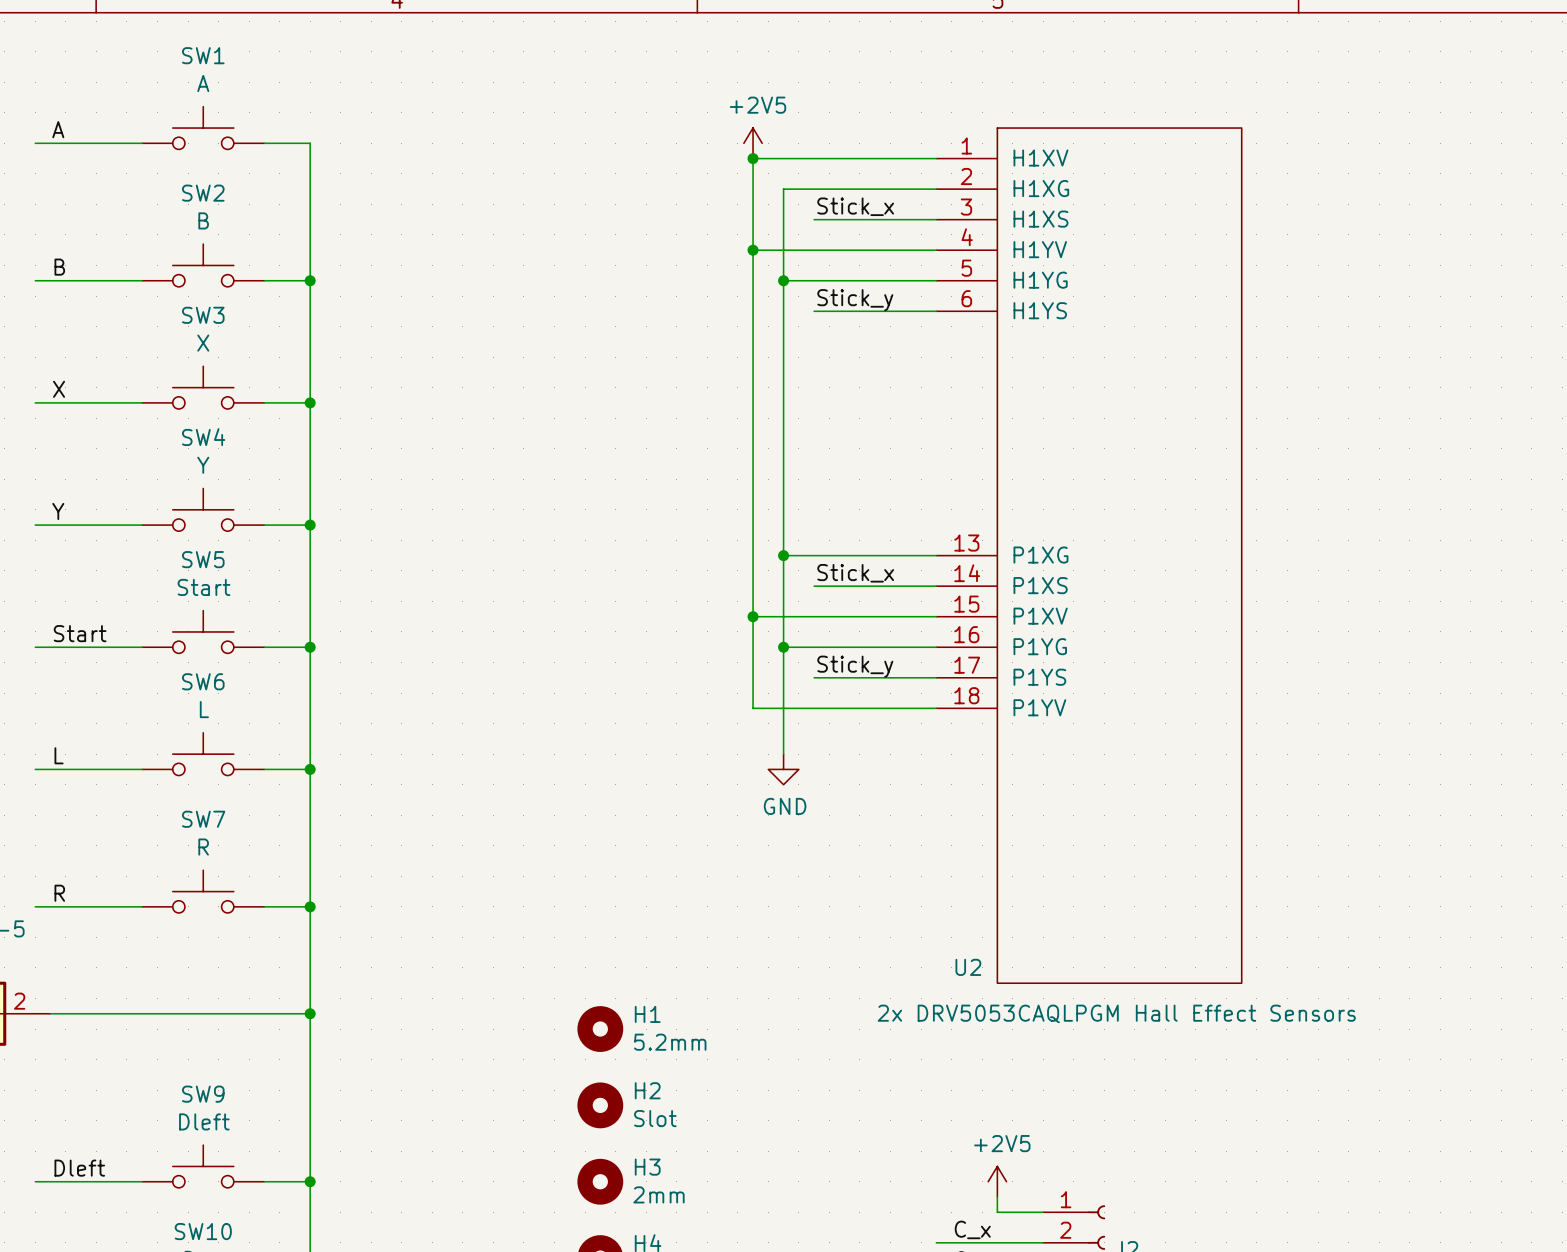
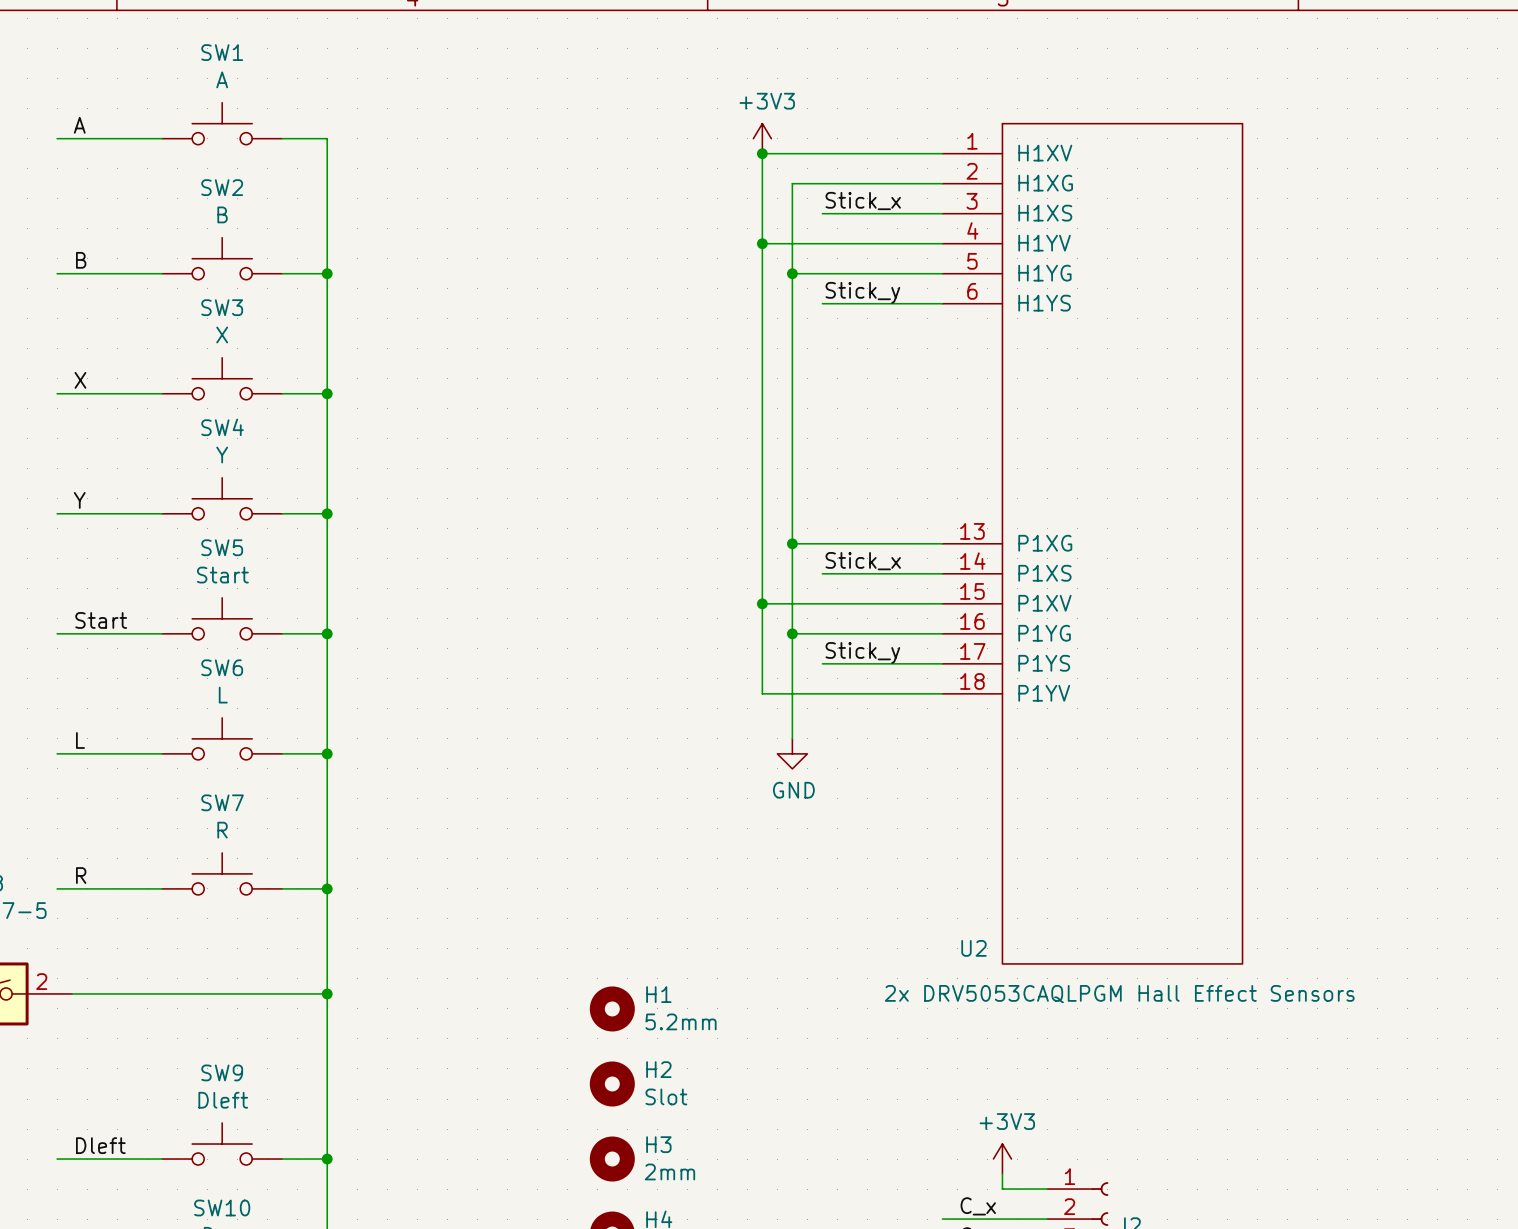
power symbol: +2V5 (753, 143) -> +3V3 (762, 138)
power symbol: +2V5 (997, 1181) -> +3V3 (1002, 1159)

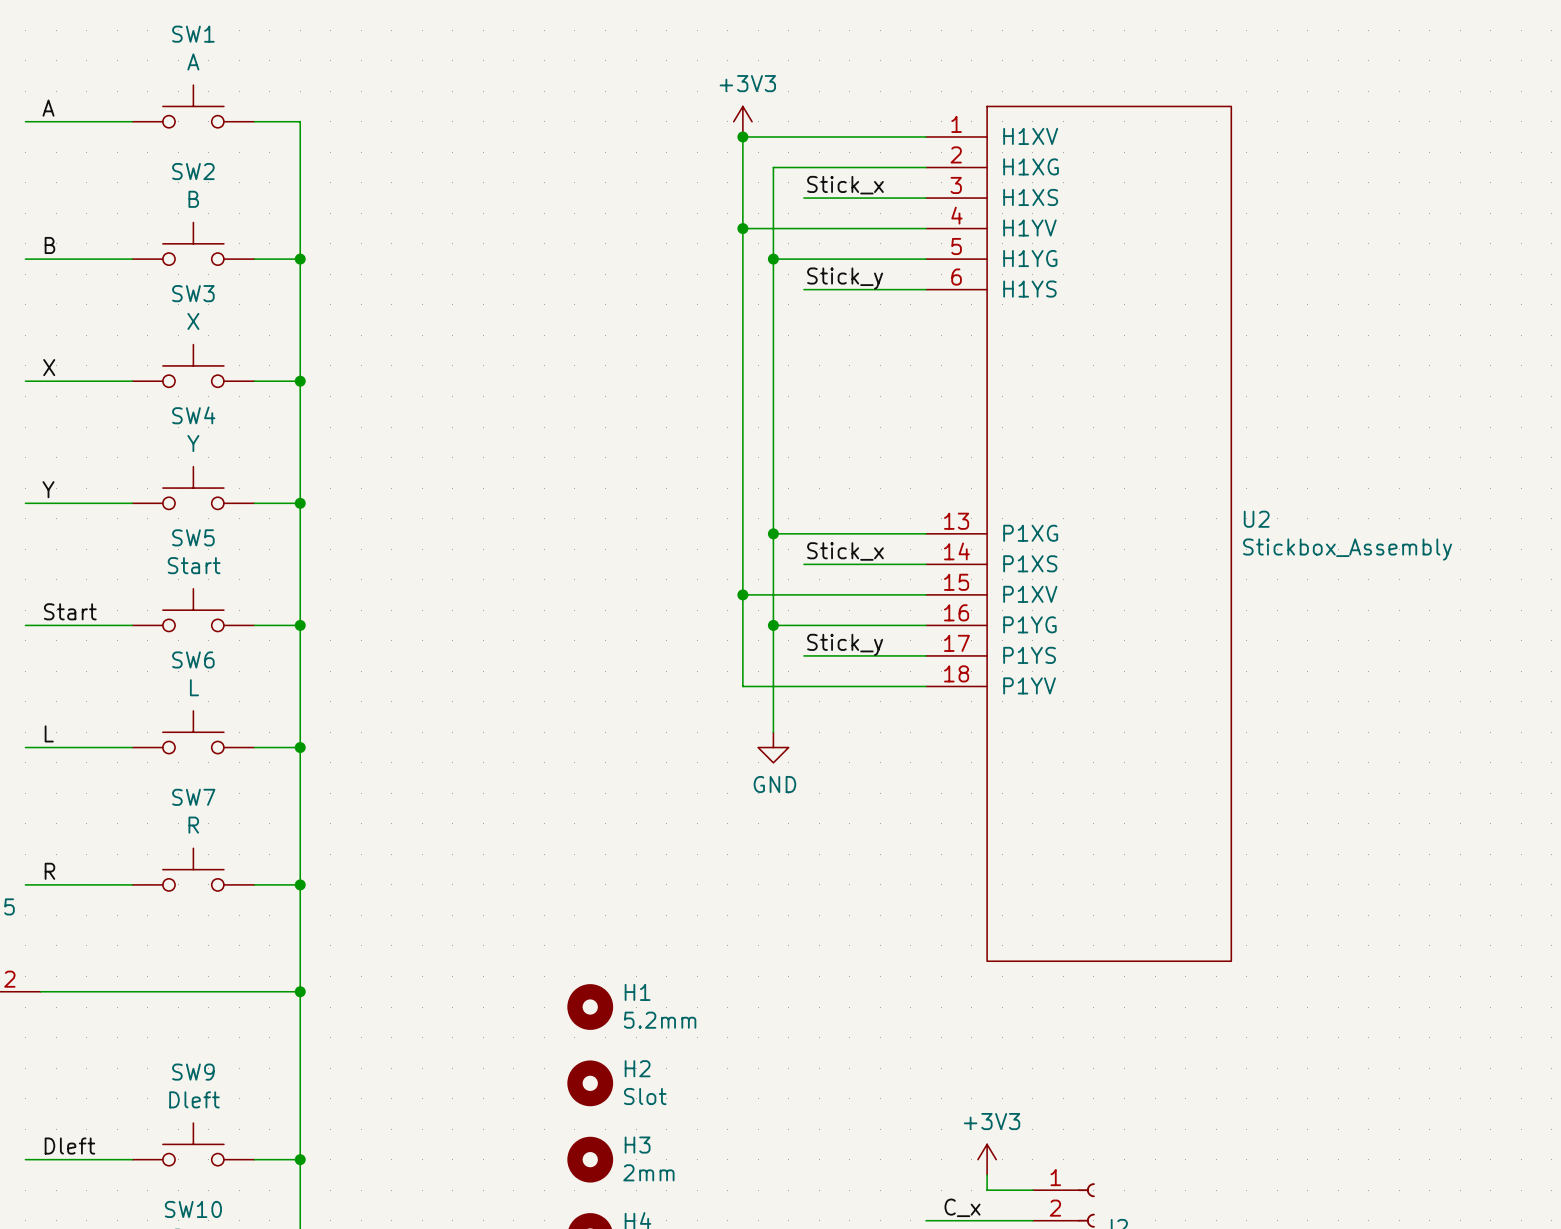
U2 name position: U2 (973, 948) -> U2 (1256, 519)
U2 value: 2x DRV5053CAQLPGM Hall Effect Sensors (1119, 994) -> Stickbox_Assembly (1347, 549)

